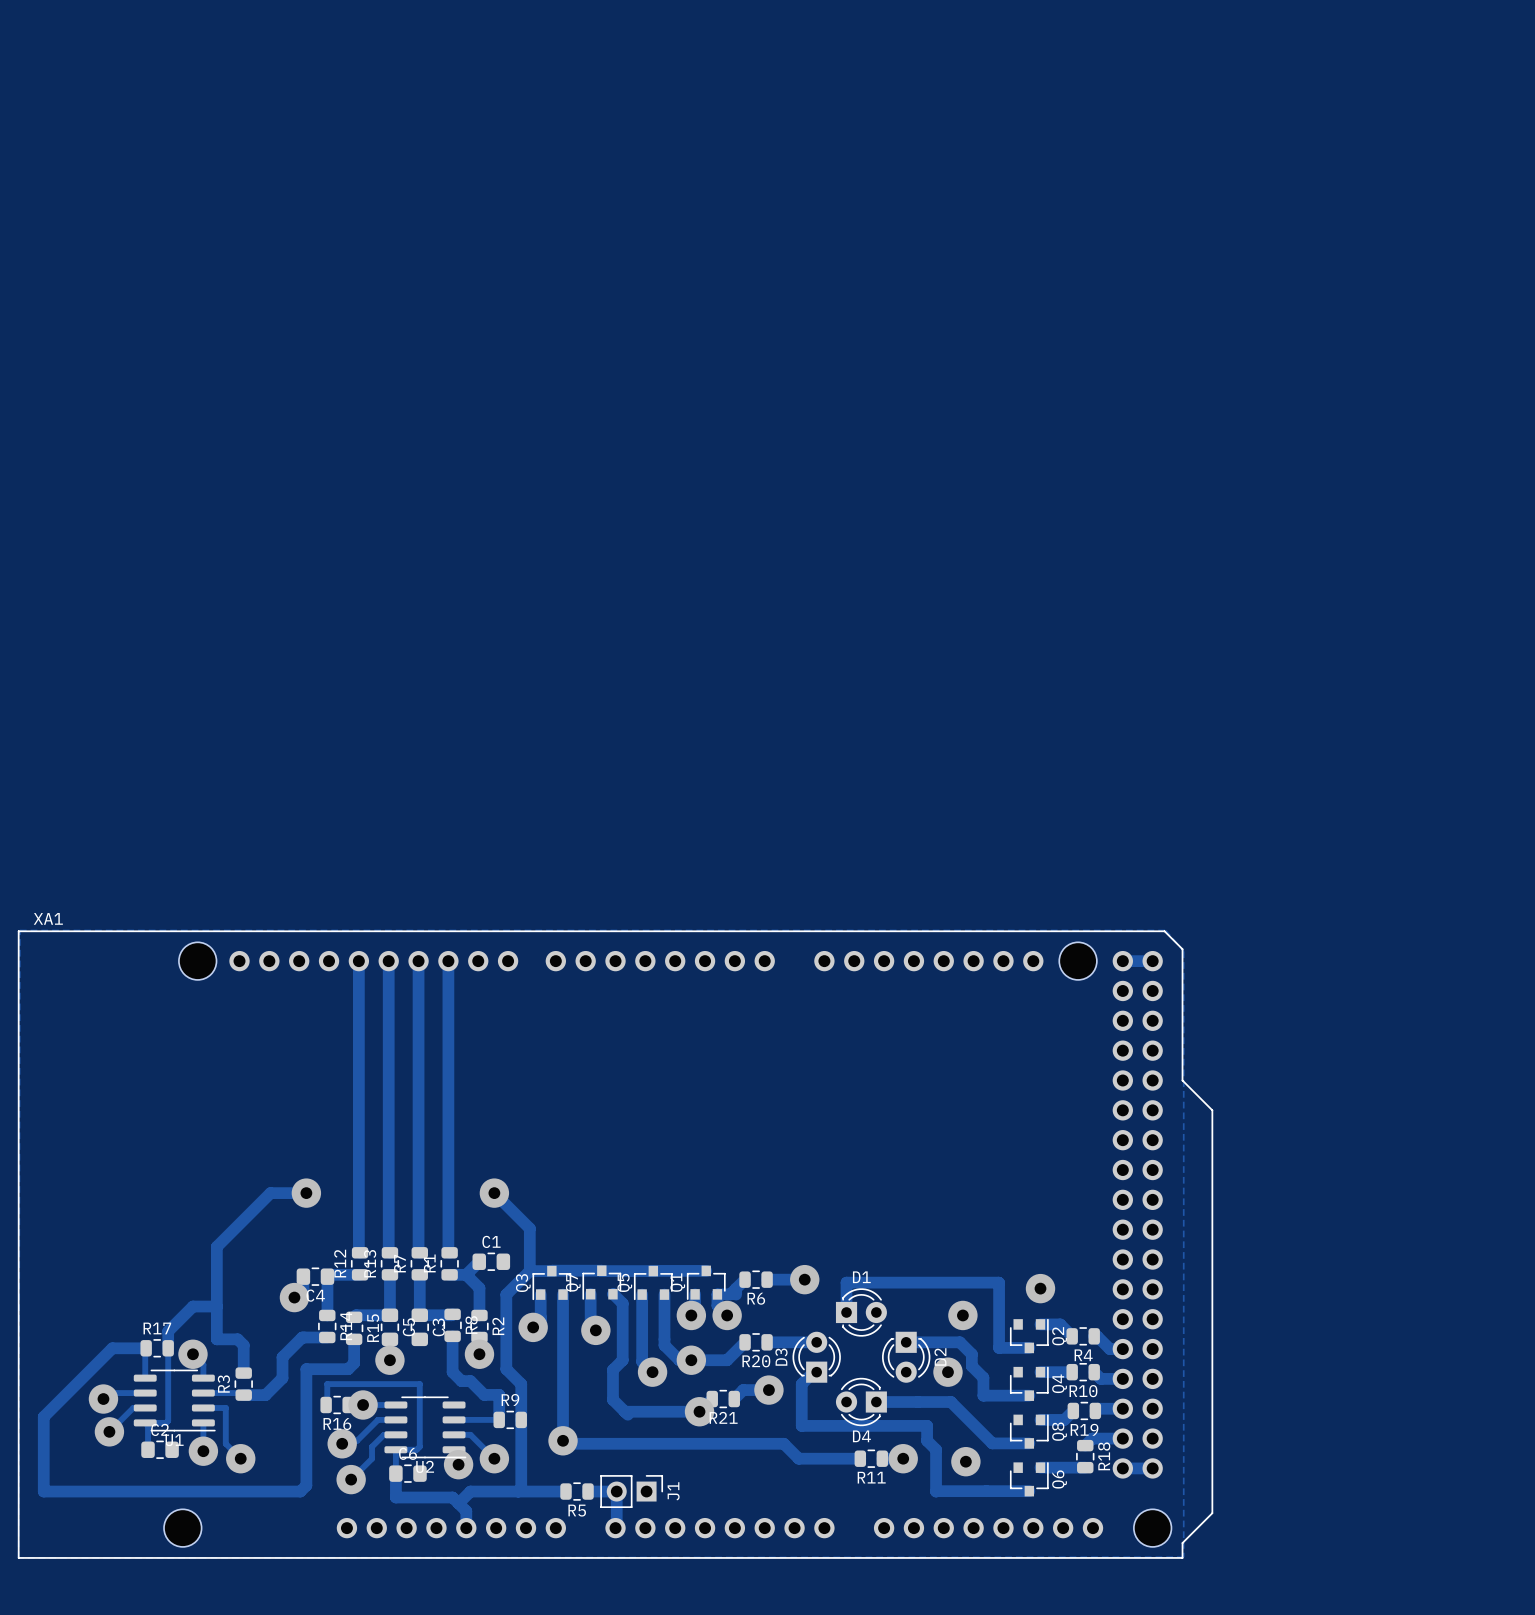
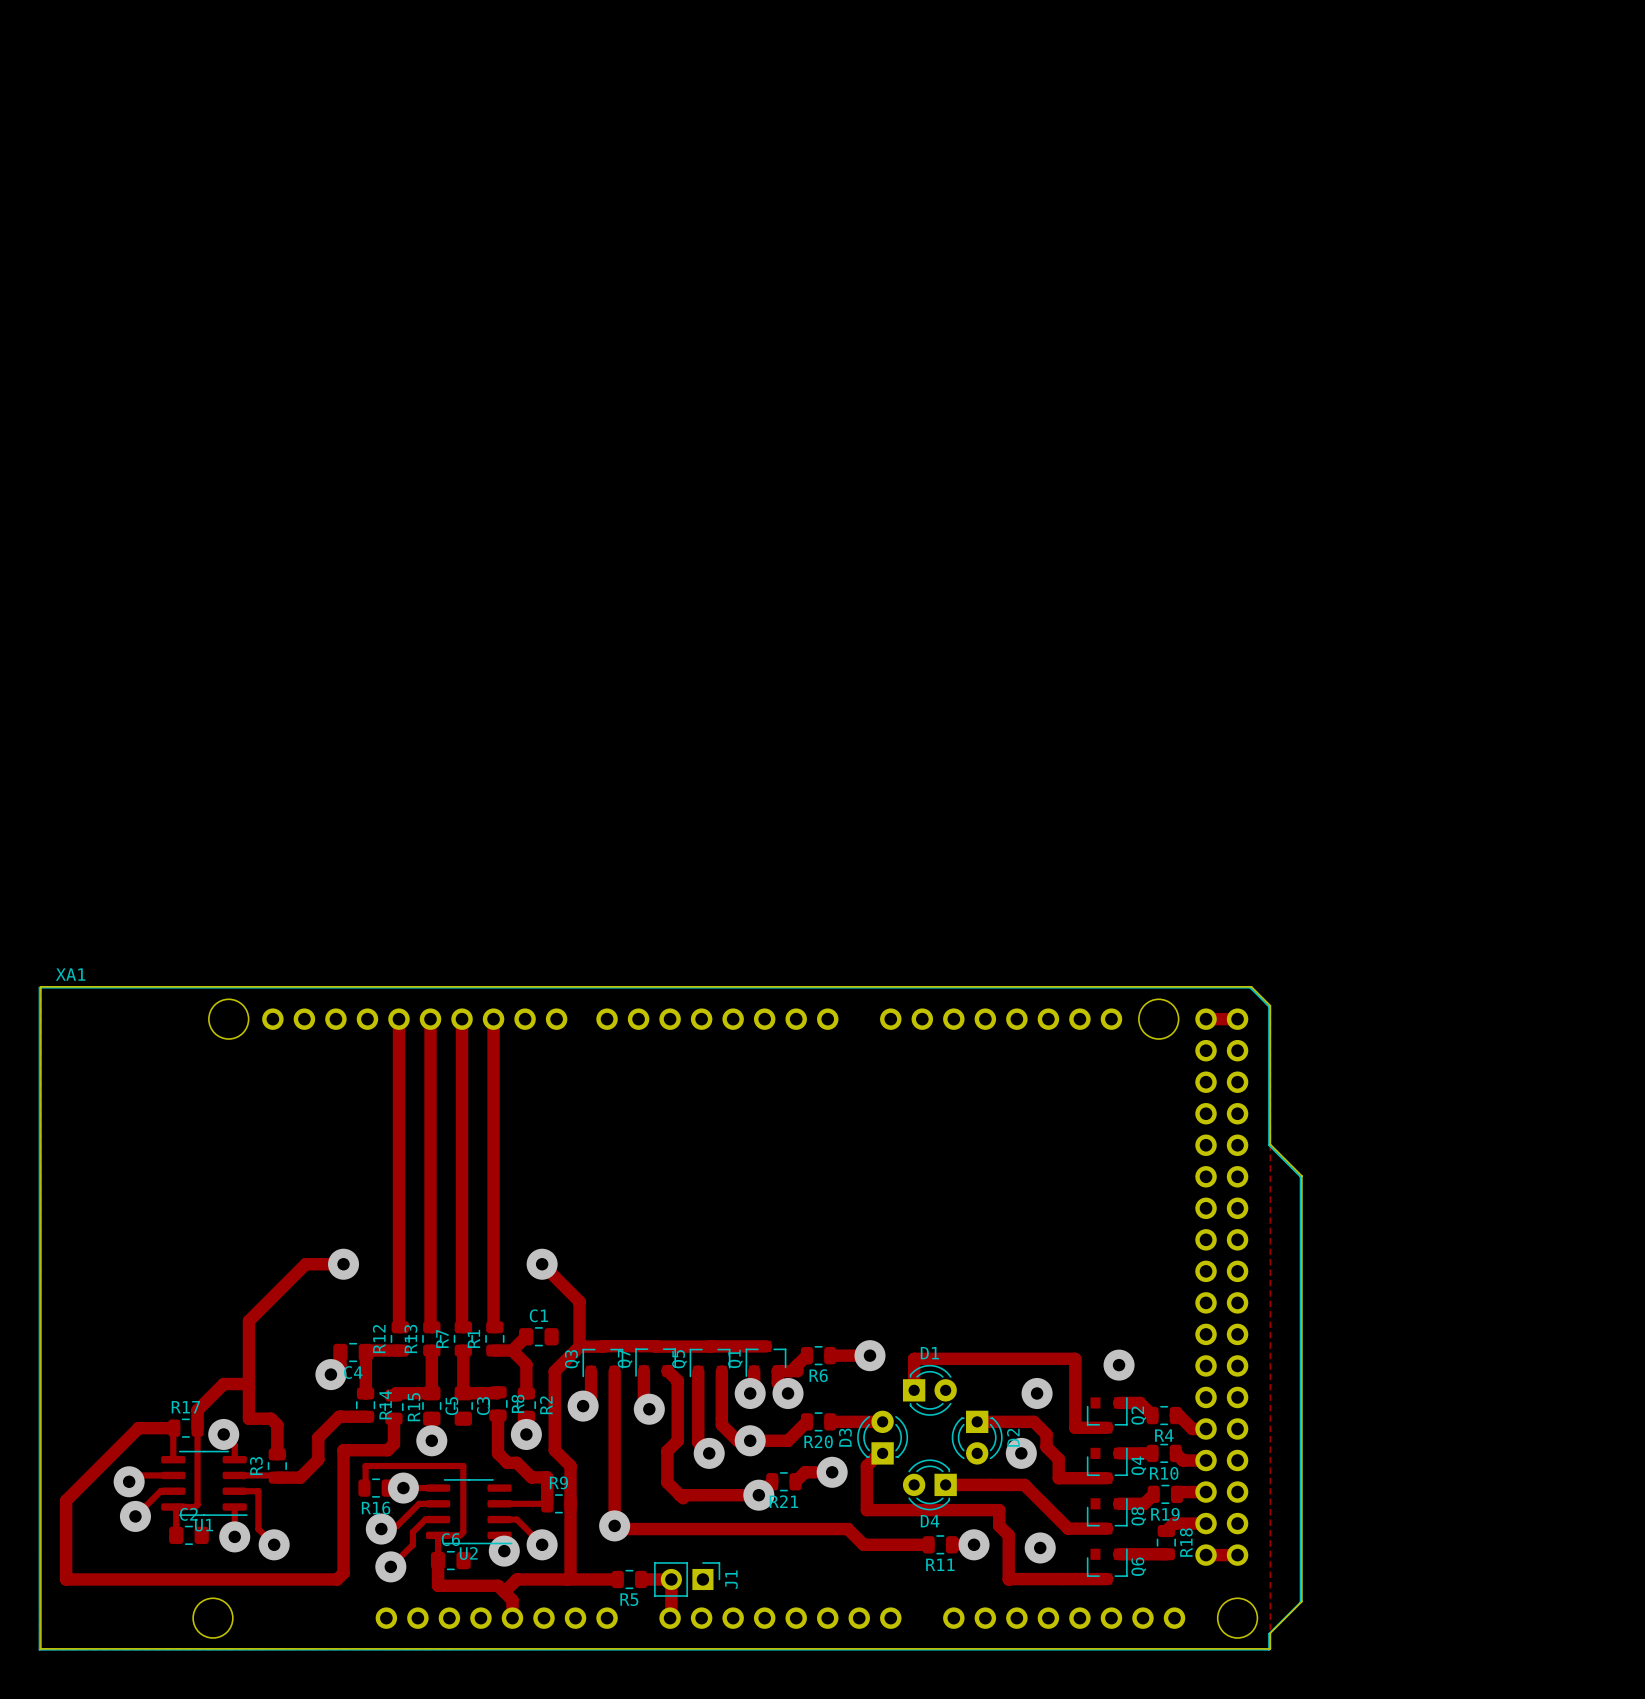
board edge: none -> (40, 986) (1251, 986) (1270, 1005) (1270, 1144) (1301, 1175) (1301, 1601) (1270, 1633) (1270, 1648) (40, 1648) (40, 986)

